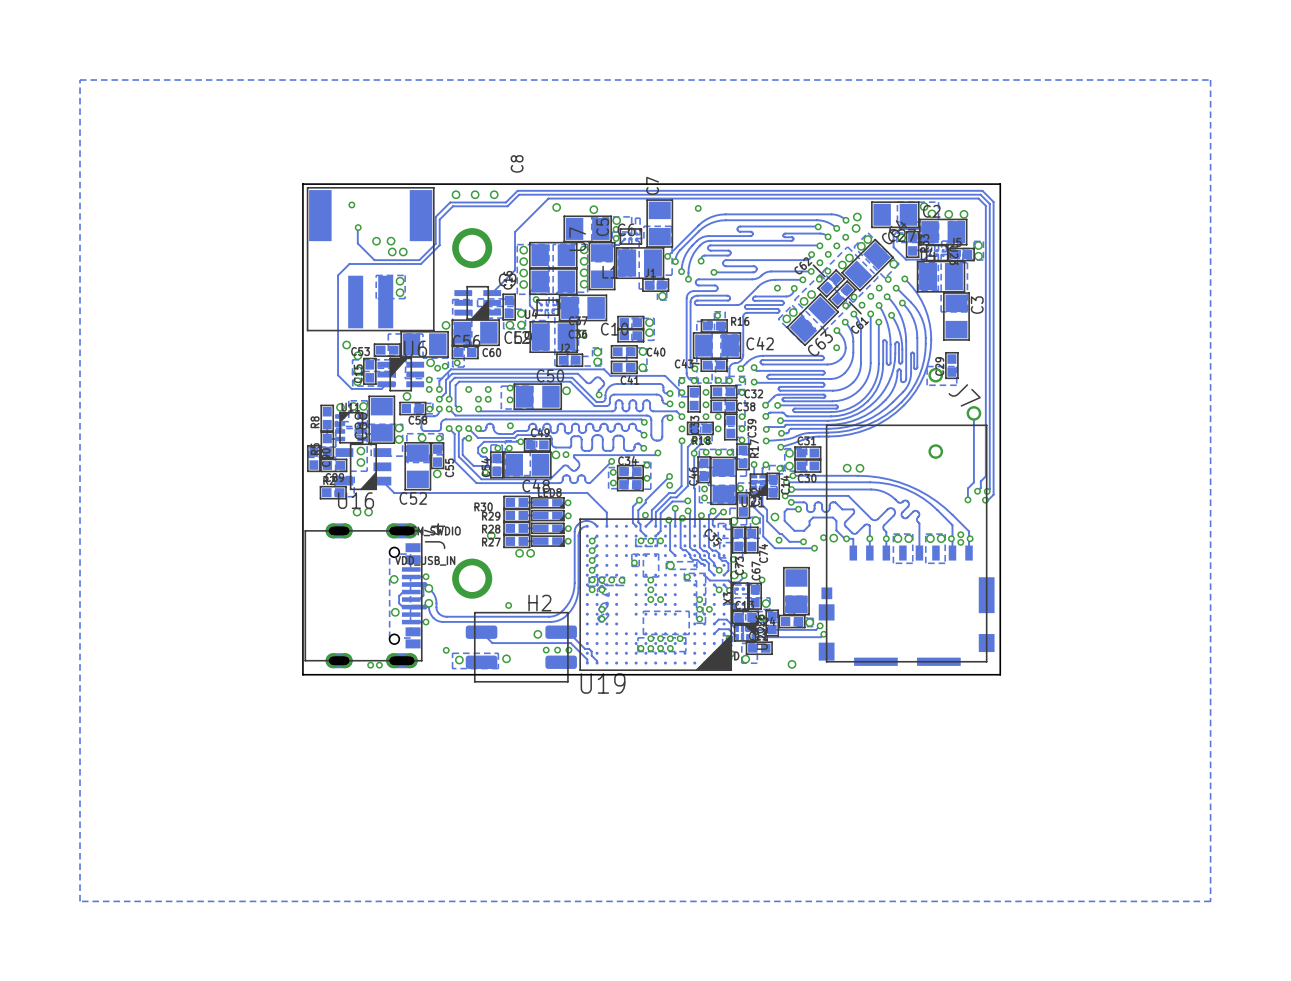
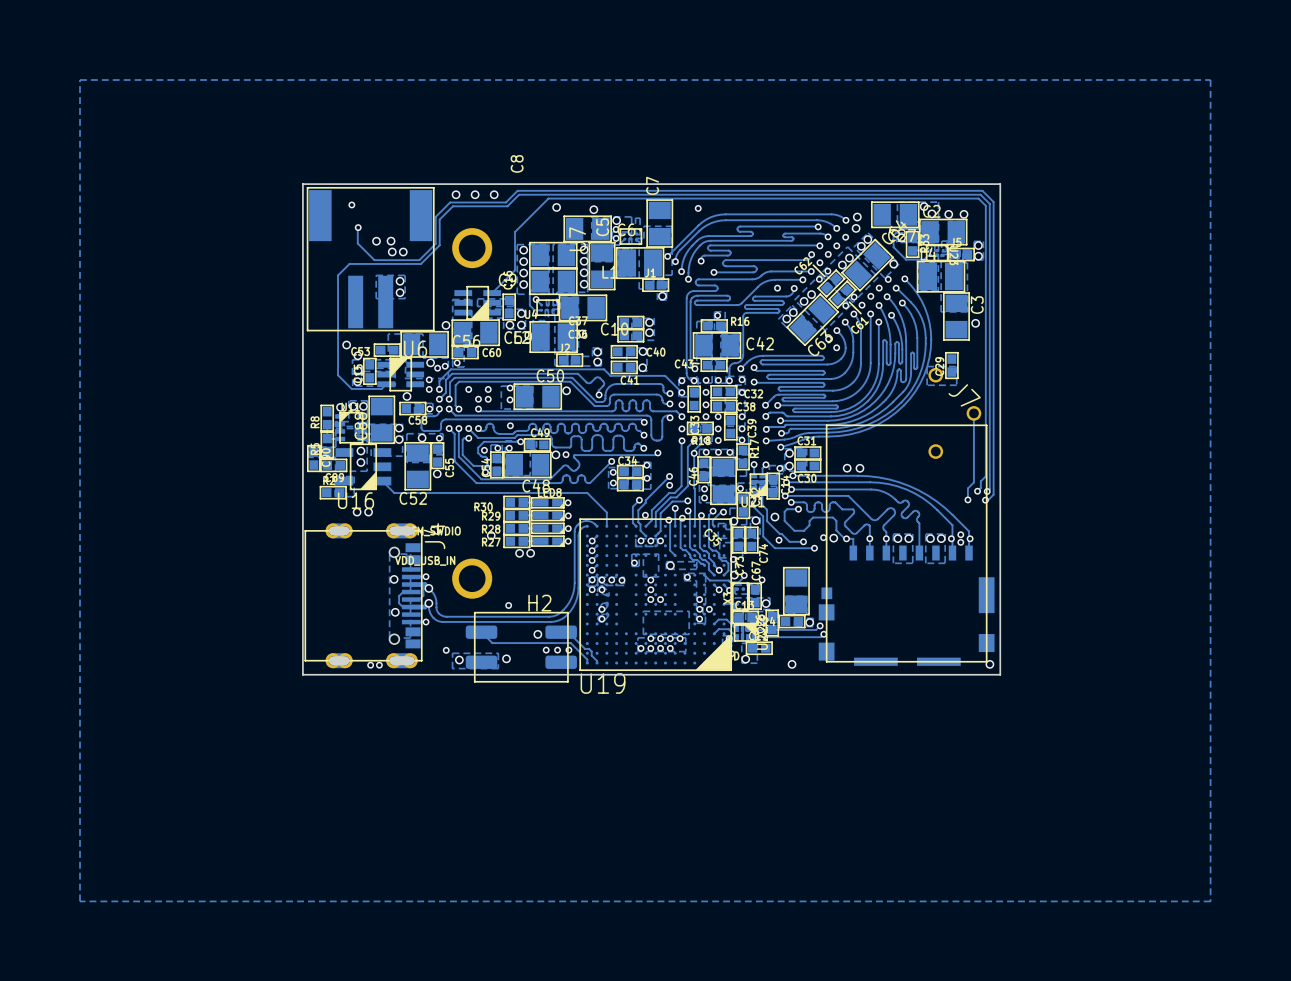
via: none -> (975, 323)
via: none -> (828, 339)
via: none -> (718, 440)
via: none -> (989, 664)

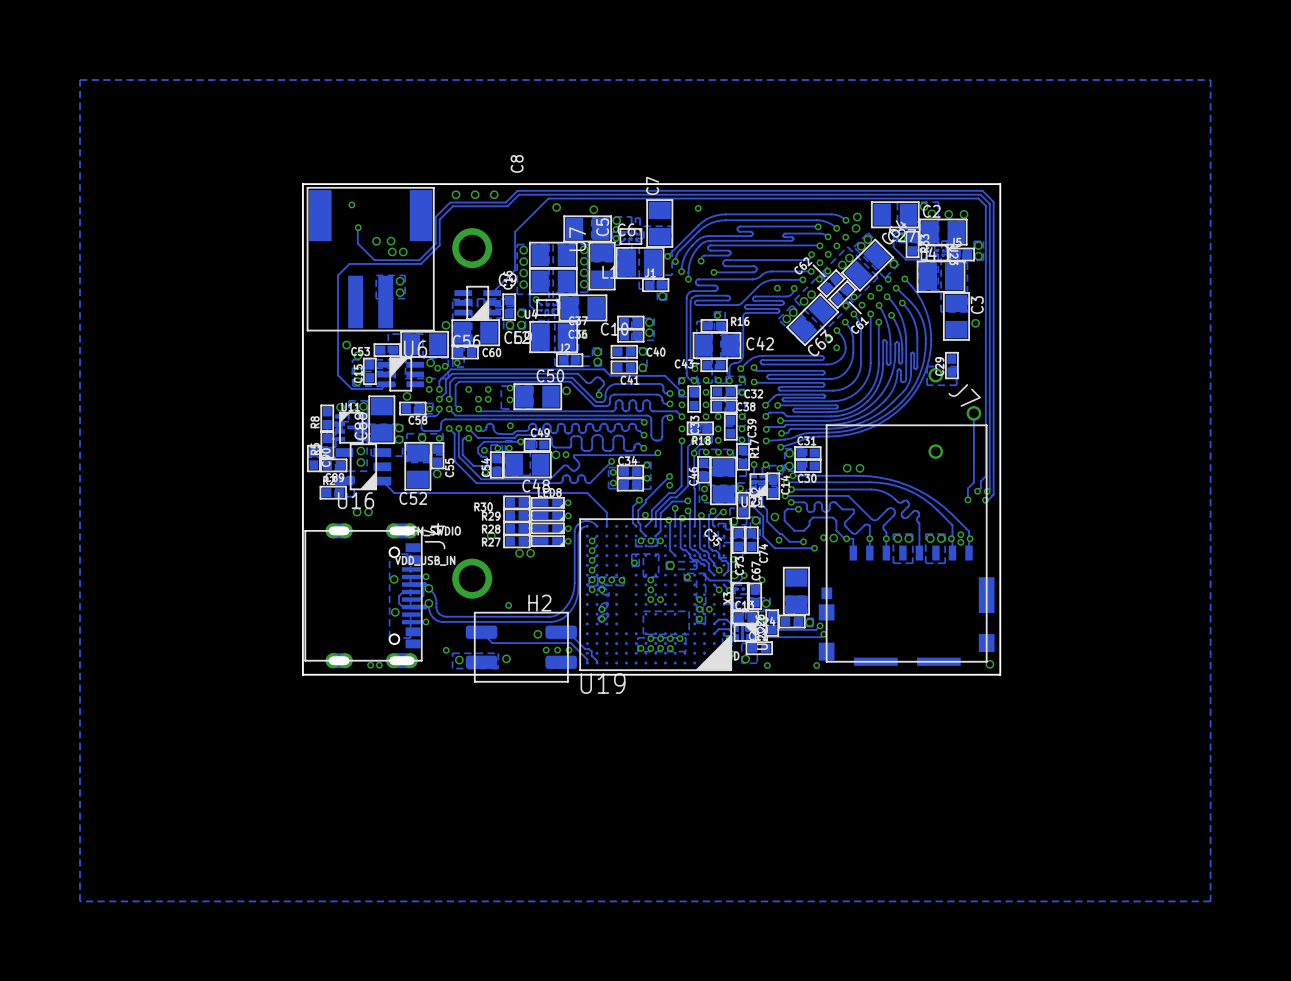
via: (792, 664) -> none
via: none -> (767, 665)
via: none -> (816, 665)

